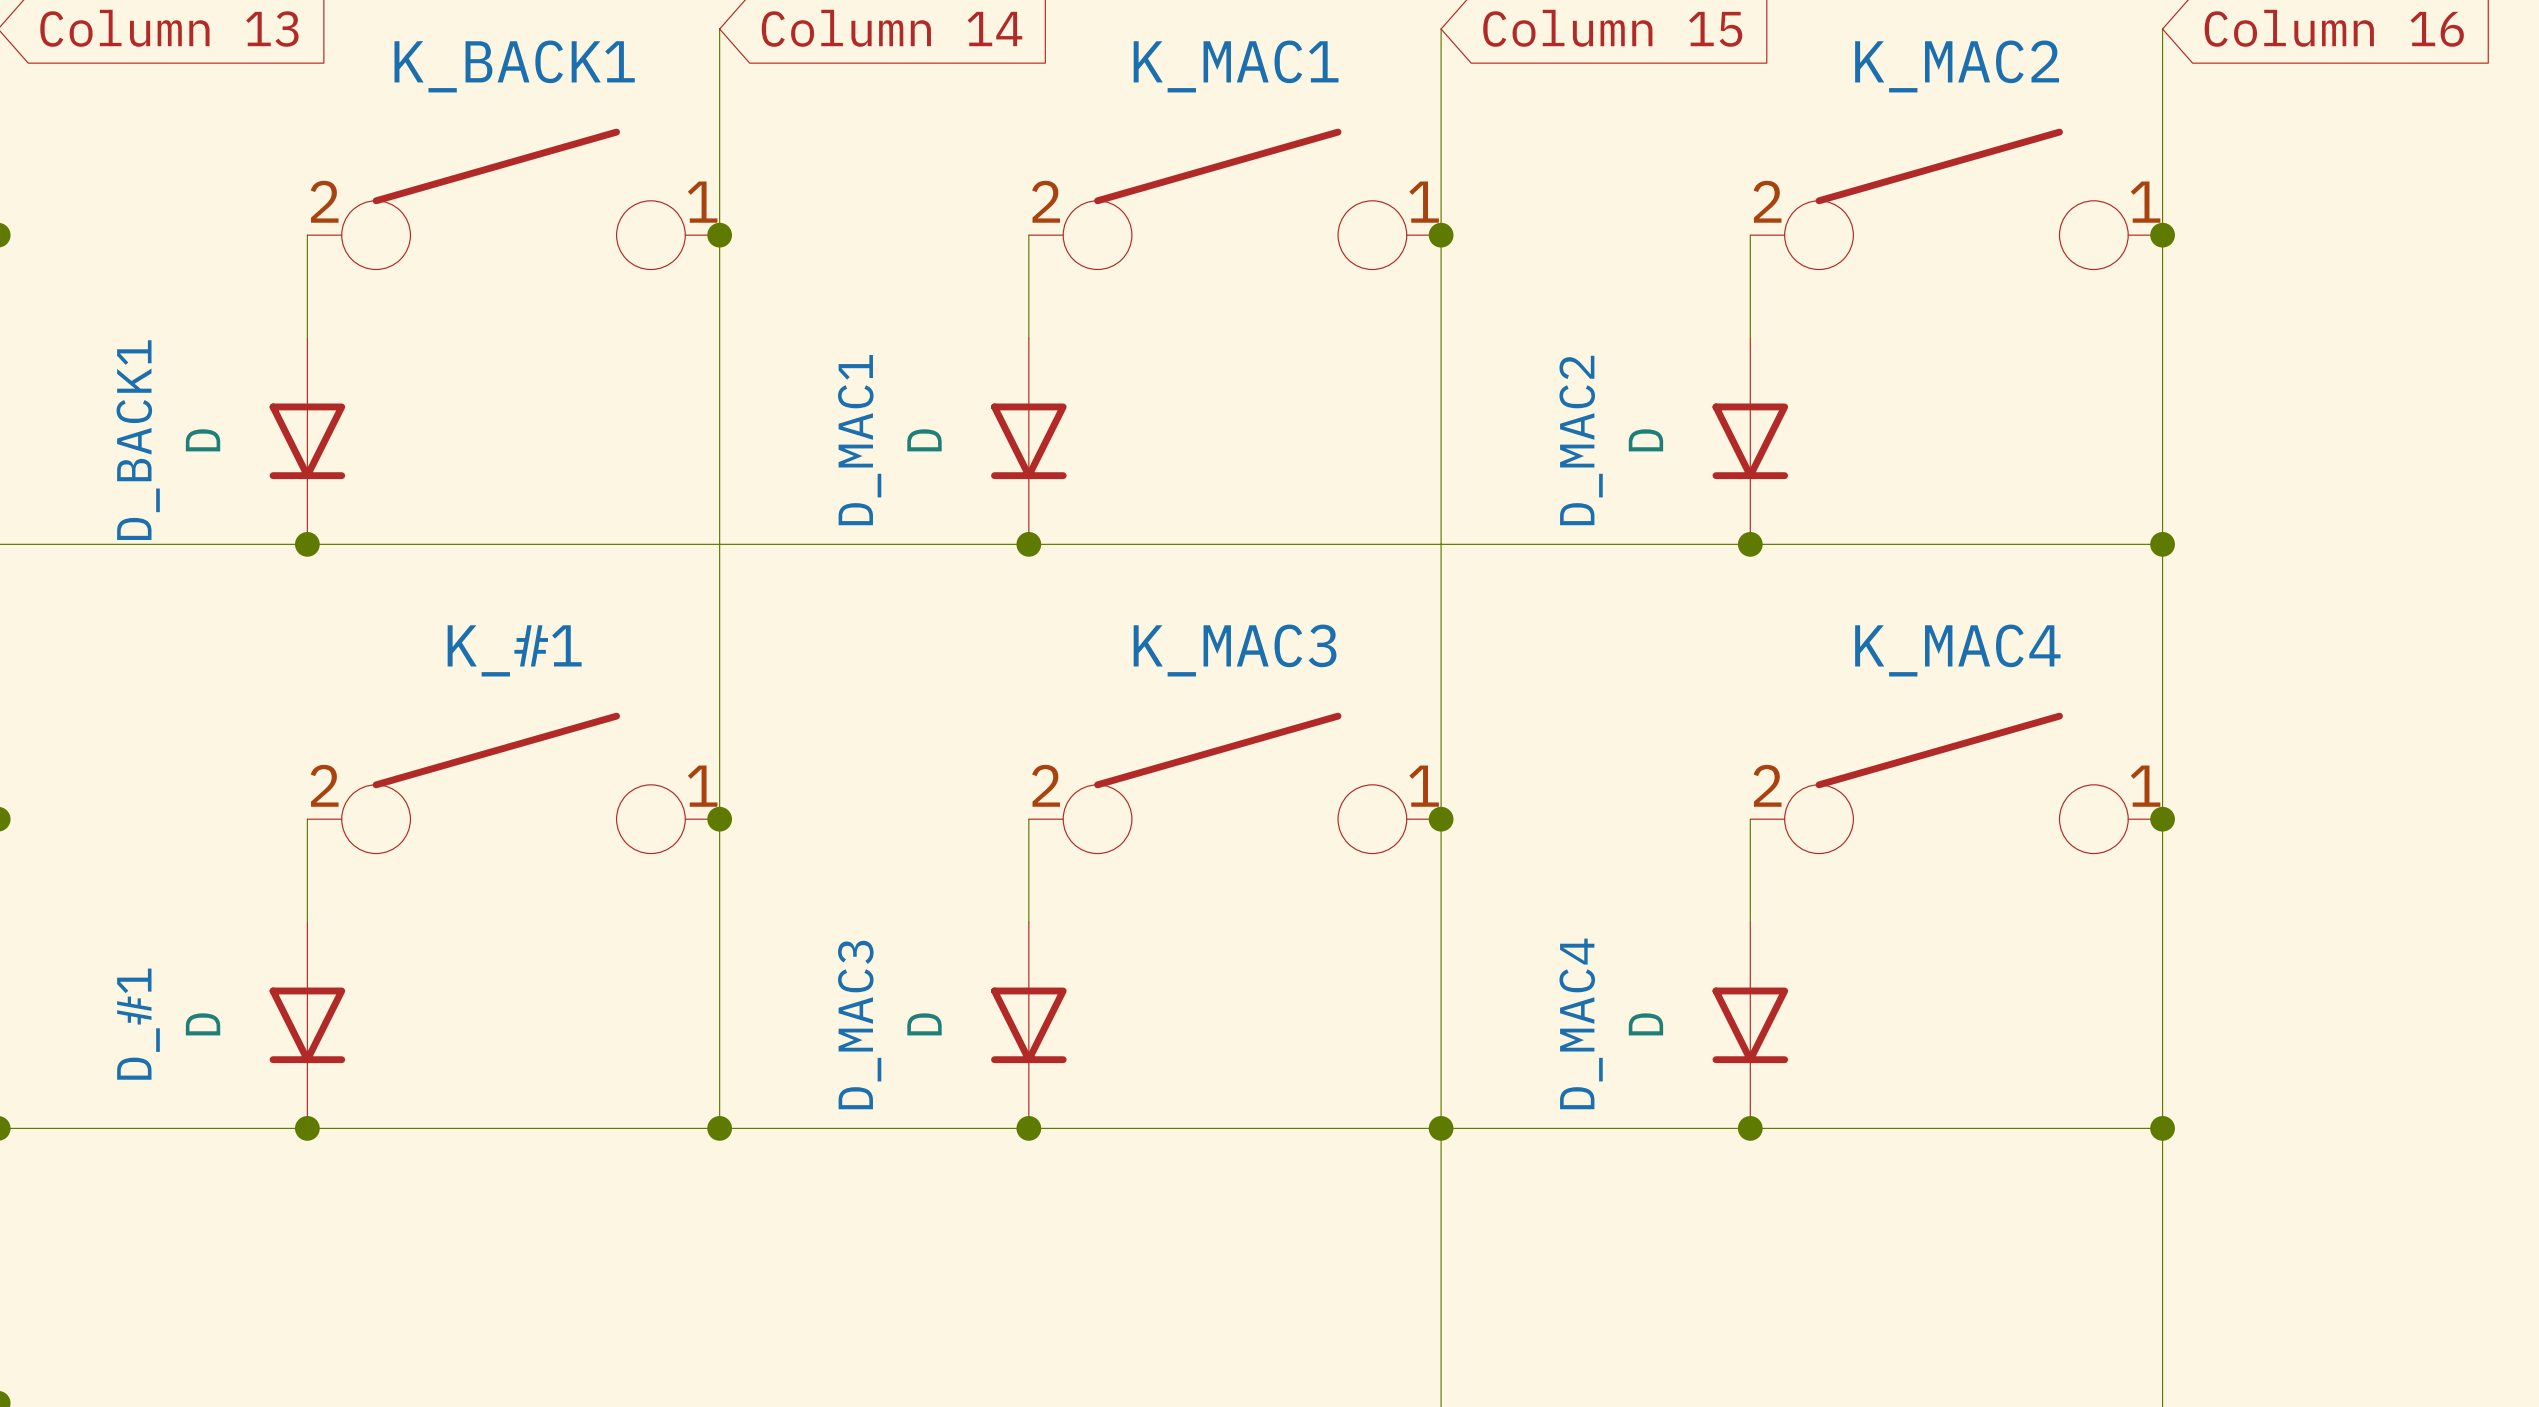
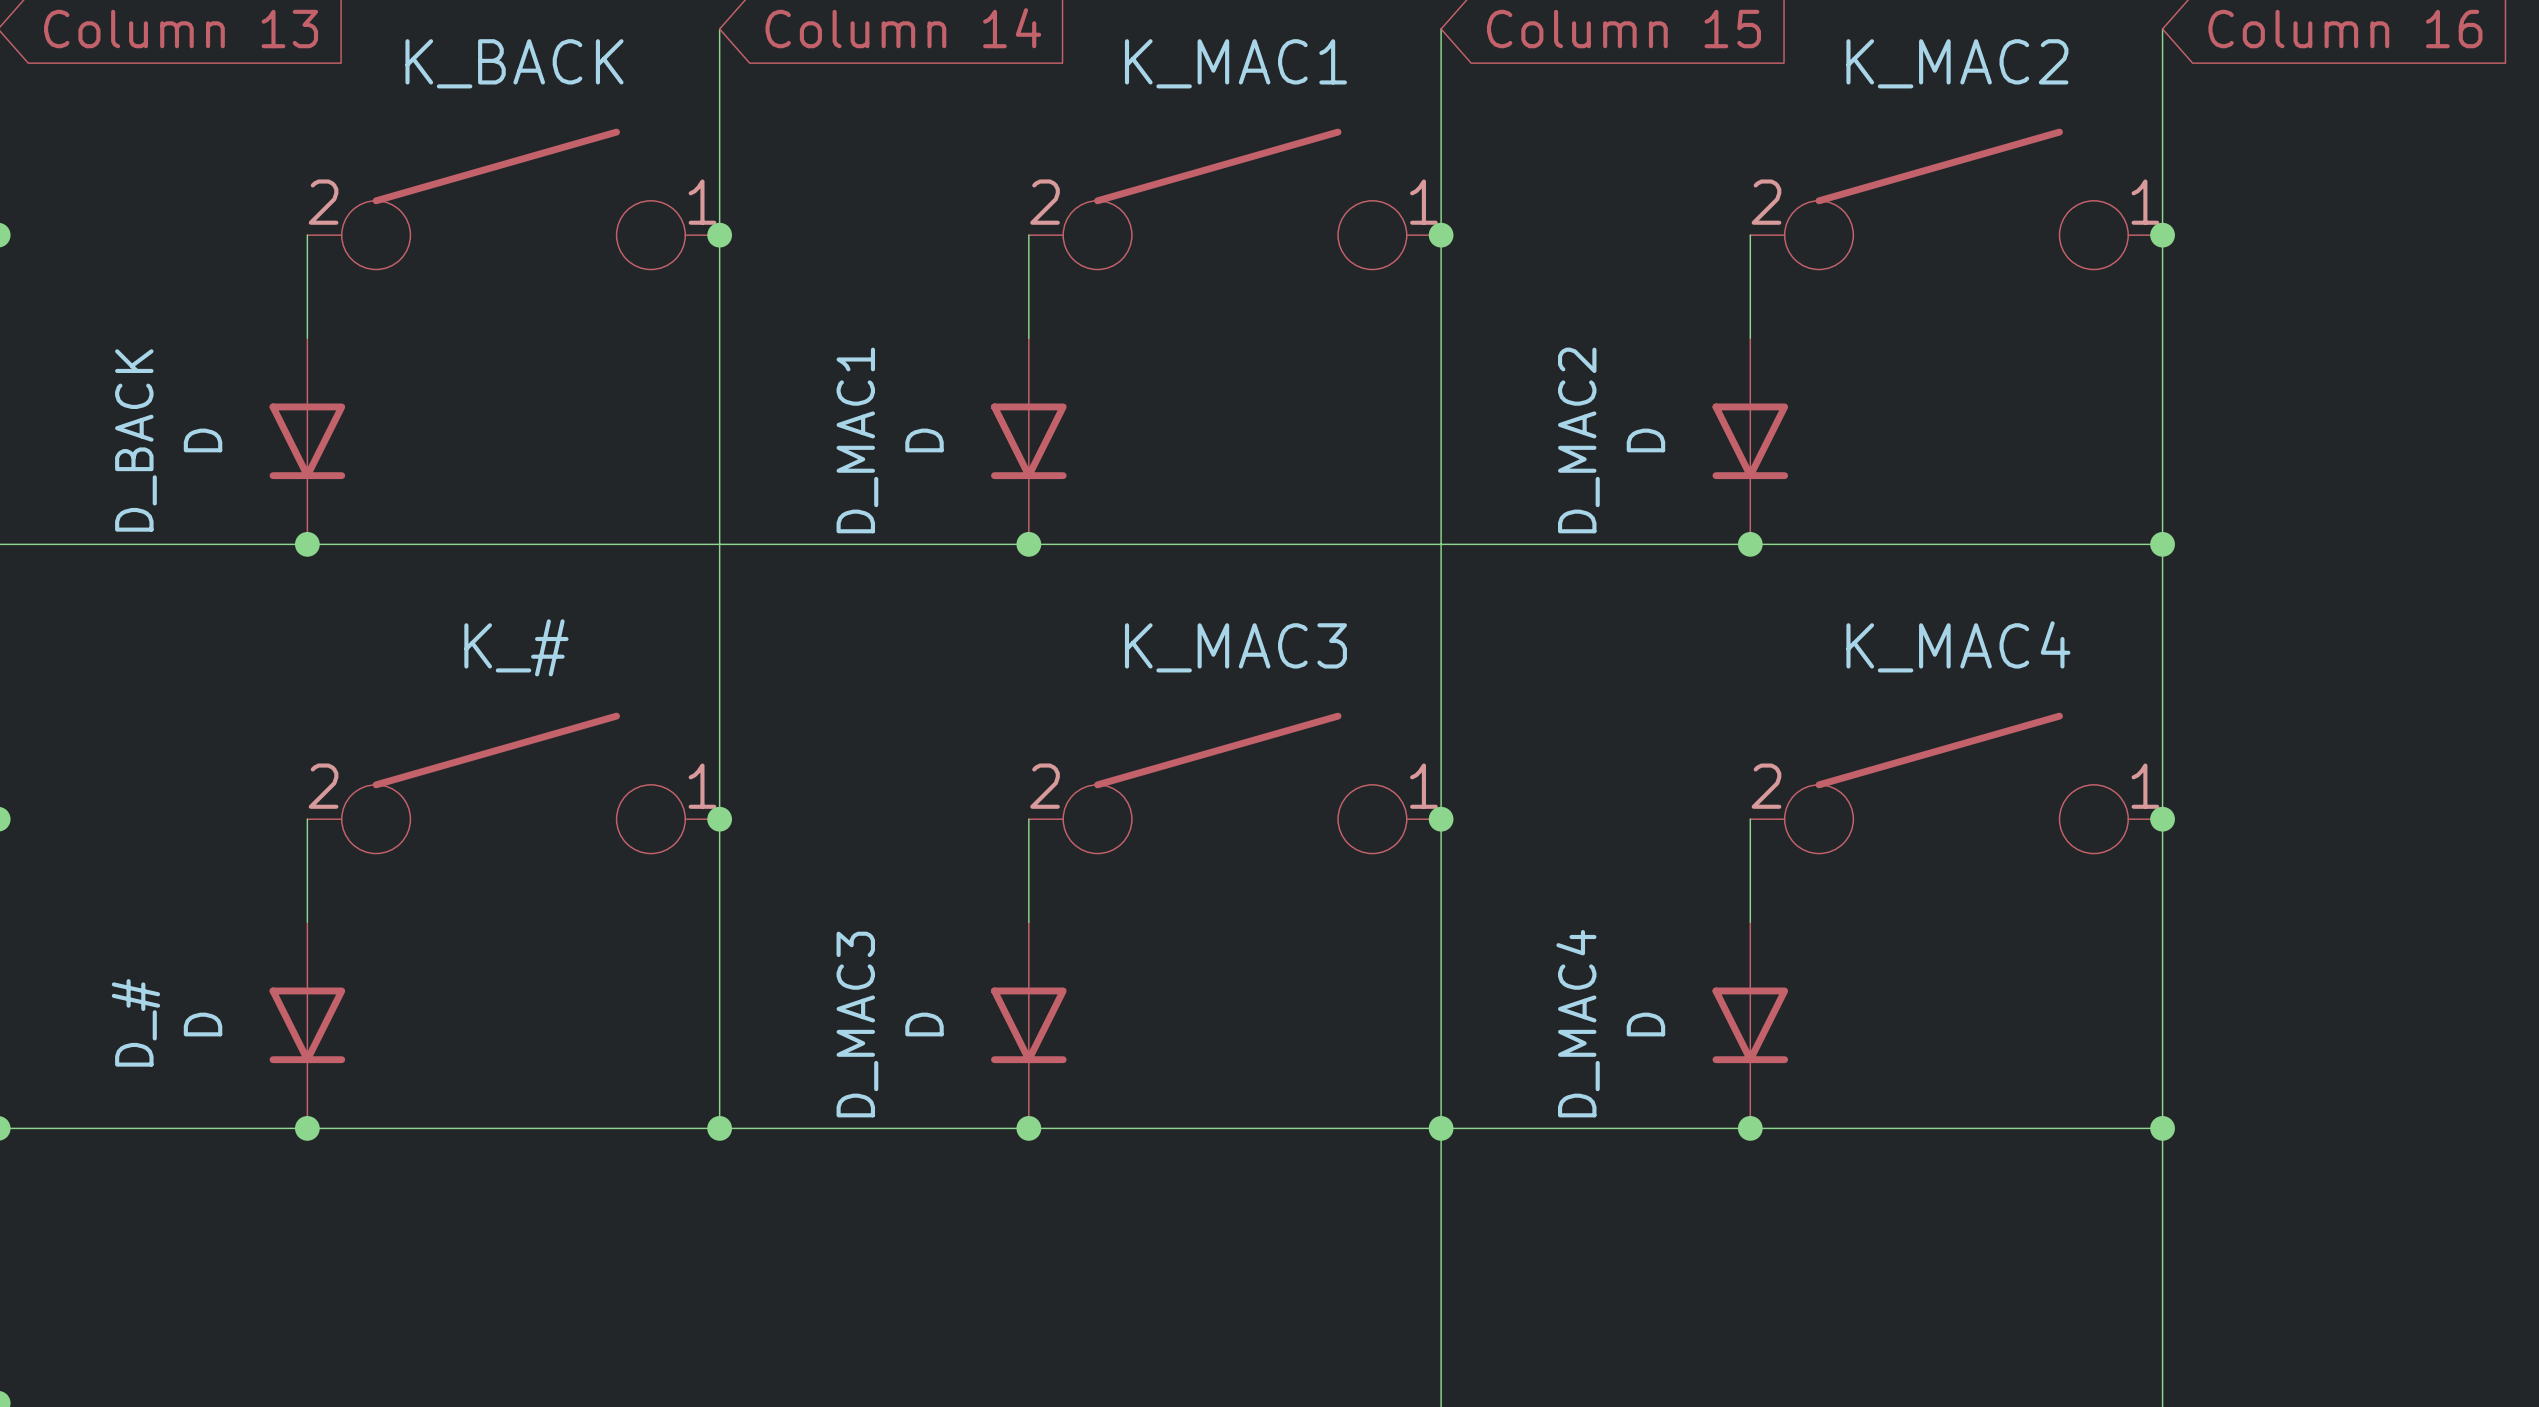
K_BACK1 name: K_BACK1 (514, 66) -> K_BACK (514, 63)
D_BACK1 name: D_BACK1 (138, 440) -> D_BACK (135, 440)
K_#1 name: K_#1 (514, 650) -> K_# (516, 647)
D_#1 name: D_#1 (138, 1024) -> D_# (135, 1022)

